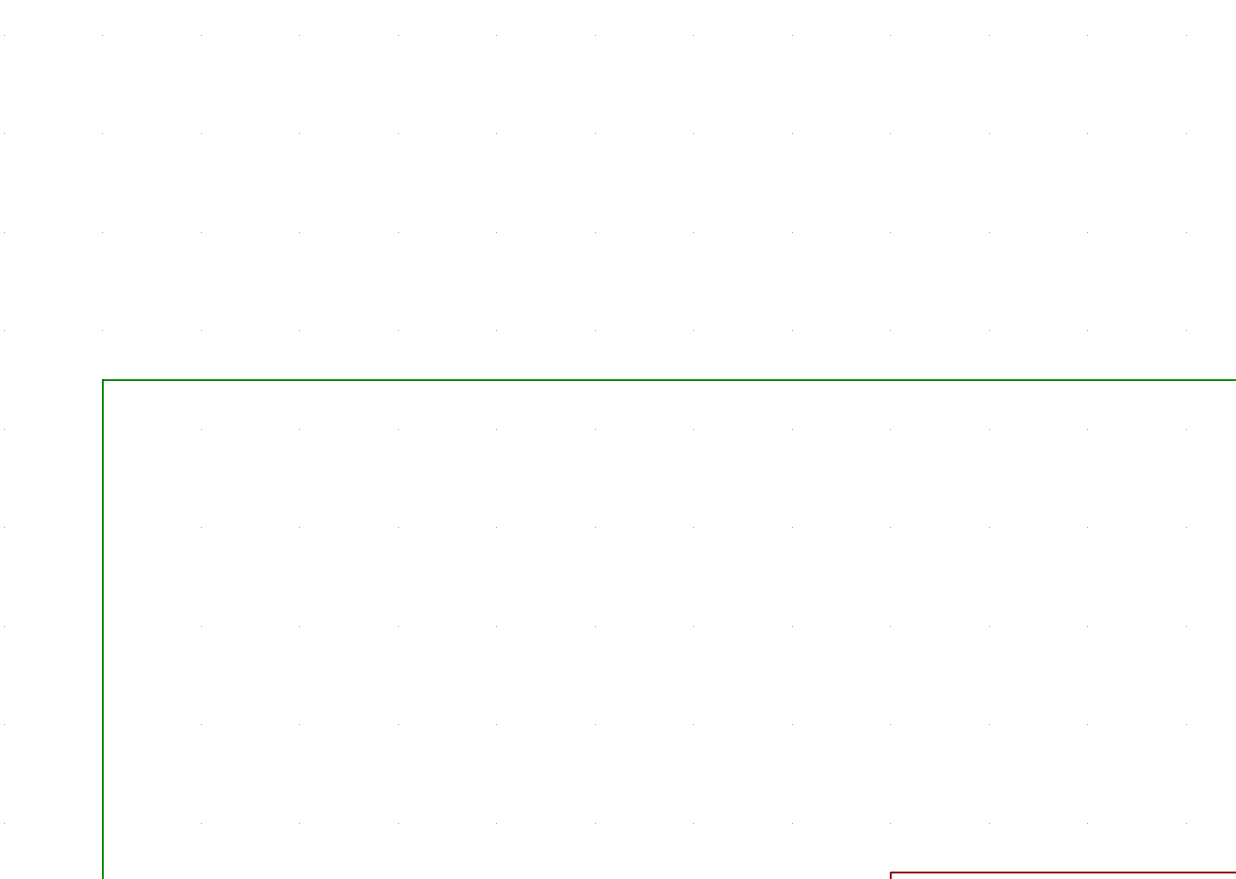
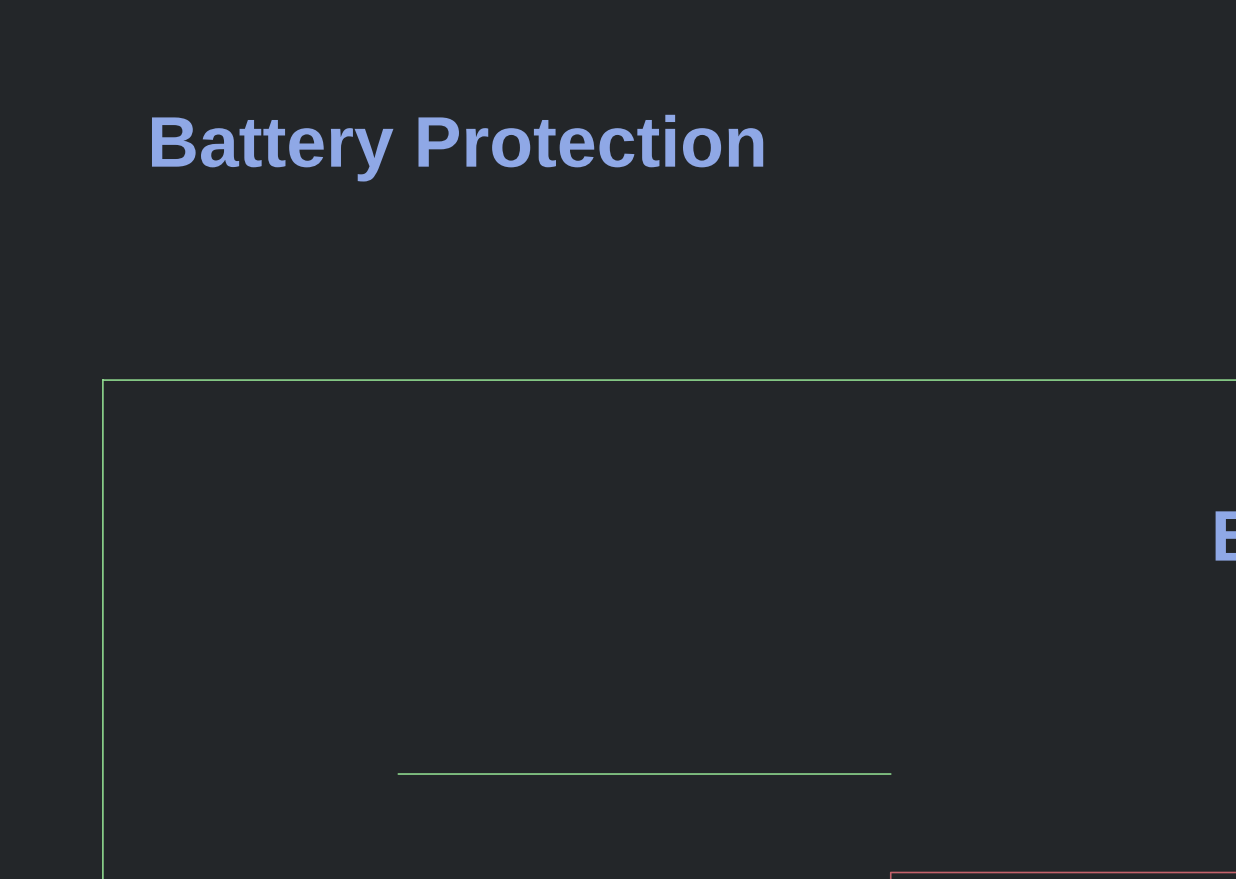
text: none -> Battery Protection (457, 148)
wire: none -> (398, 774) (890, 774)

